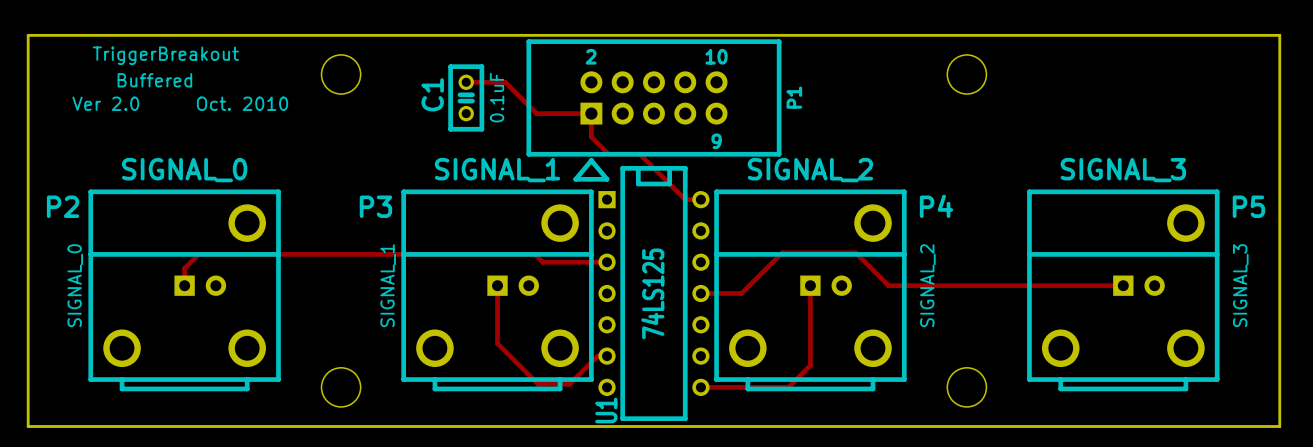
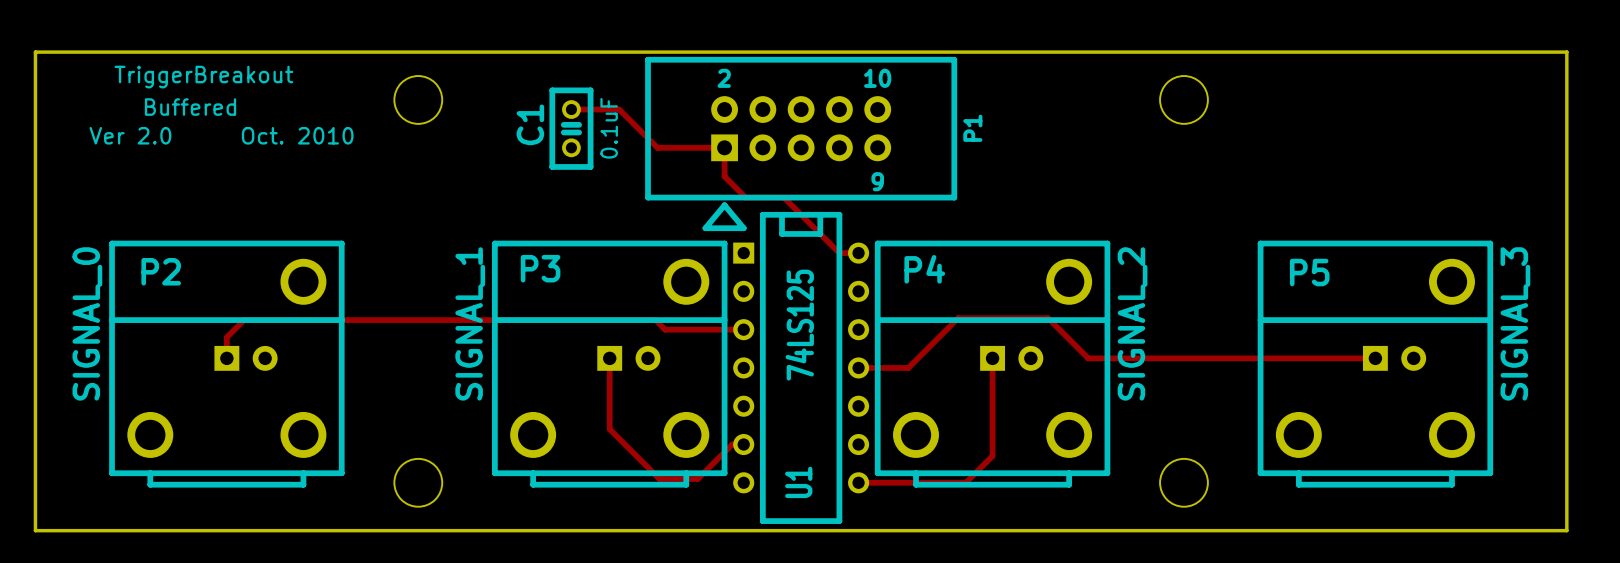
P2 value rotation: 0° (184, 170) -> 90° counterclockwise (87, 323)
P3 value rotation: 0° (497, 170) -> 90° counterclockwise (470, 323)
P4 value rotation: 0° (810, 170) -> 90° counterclockwise (1132, 323)
P5 value rotation: 0° (1123, 170) -> 90° counterclockwise (1515, 323)
P2 name position: P2 (63, 206) -> P2 (161, 271)
P3 name position: P3 (375, 206) -> P3 (540, 268)
P4 name position: P4 (936, 206) -> P4 (924, 269)
P5 name position: P5 (1248, 206) -> P5 (1309, 272)
text: SIGNAL_0 (75, 285) -> none
text: SIGNAL_1 (388, 285) -> none
text: SIGNAL_2 (927, 285) -> none
text: SIGNAL_3 (1240, 285) -> none
U1 value position: 74LS125 (652, 293) -> 74LS125 (799, 325)
U1 name position: U1 (606, 410) -> U1 (798, 482)

